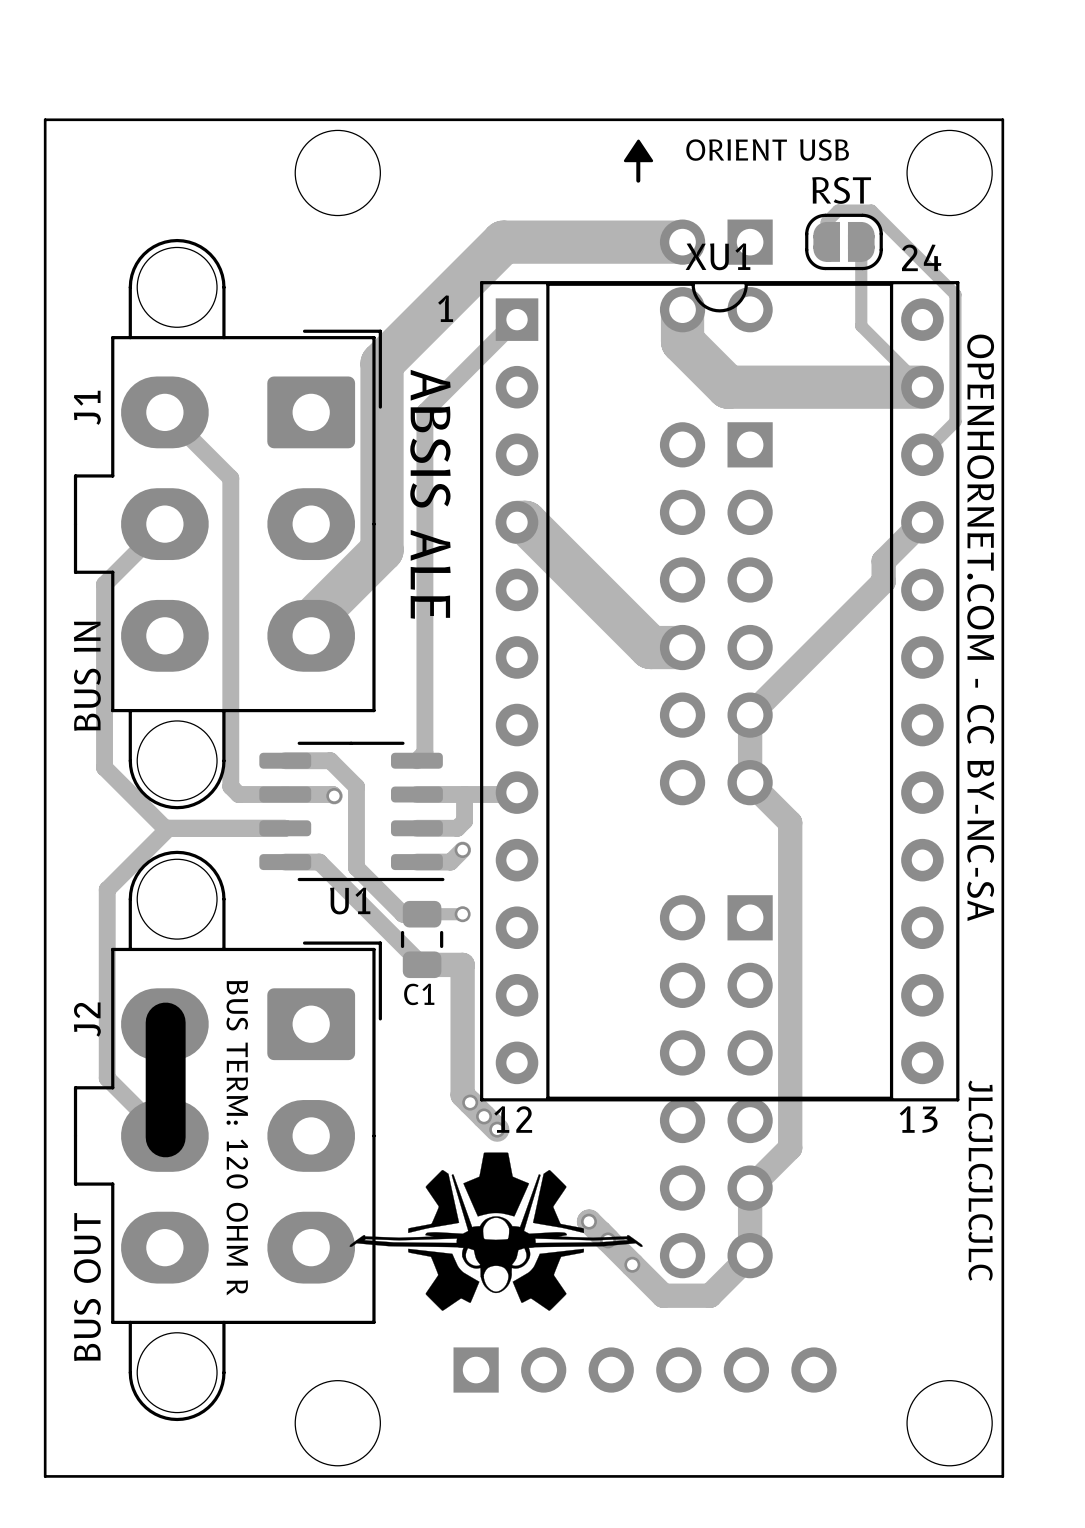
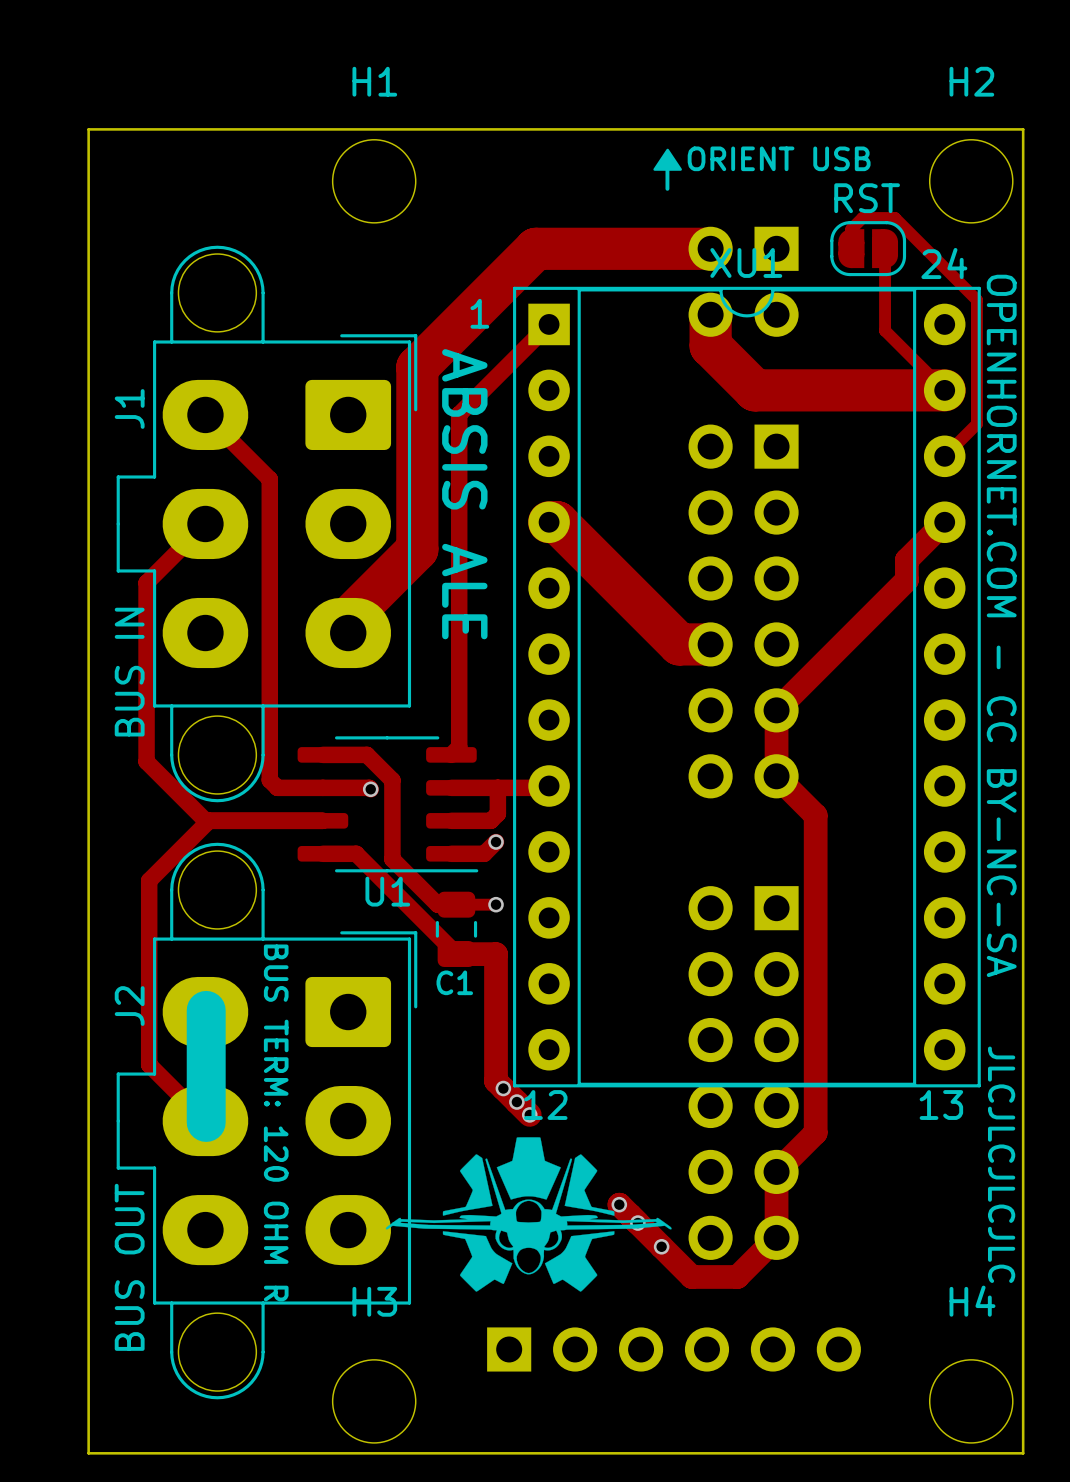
H1 name: none -> H1 (374, 81)
H2 name: none -> H2 (971, 81)
H3 name: none -> H3 (374, 1301)
H4 name: none -> H4 (972, 1301)

